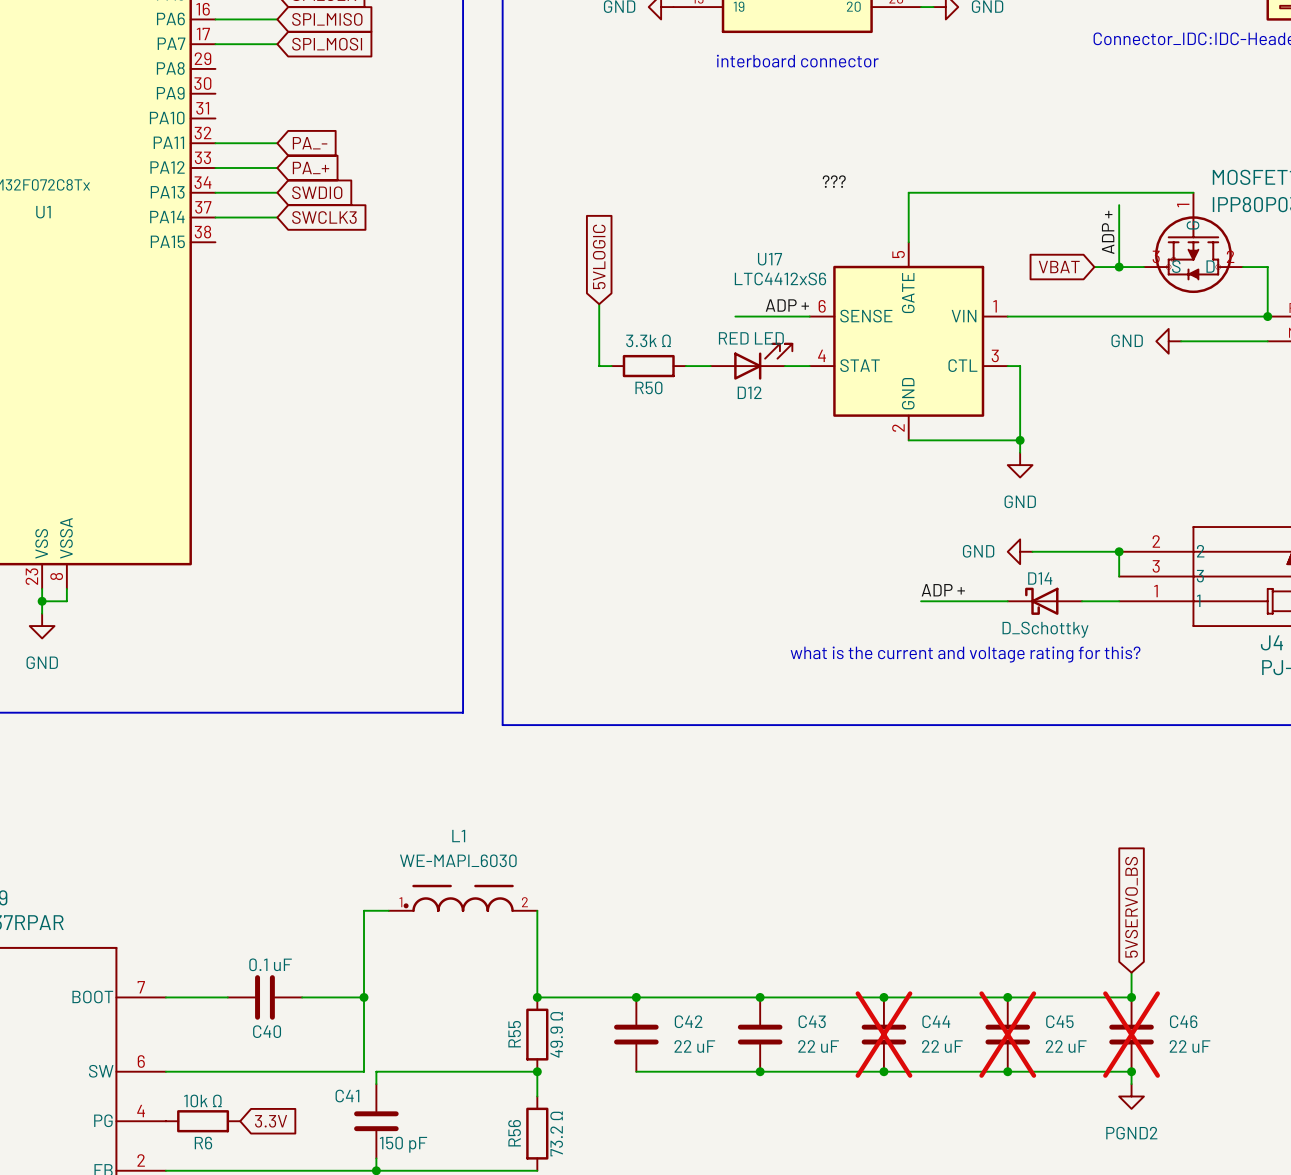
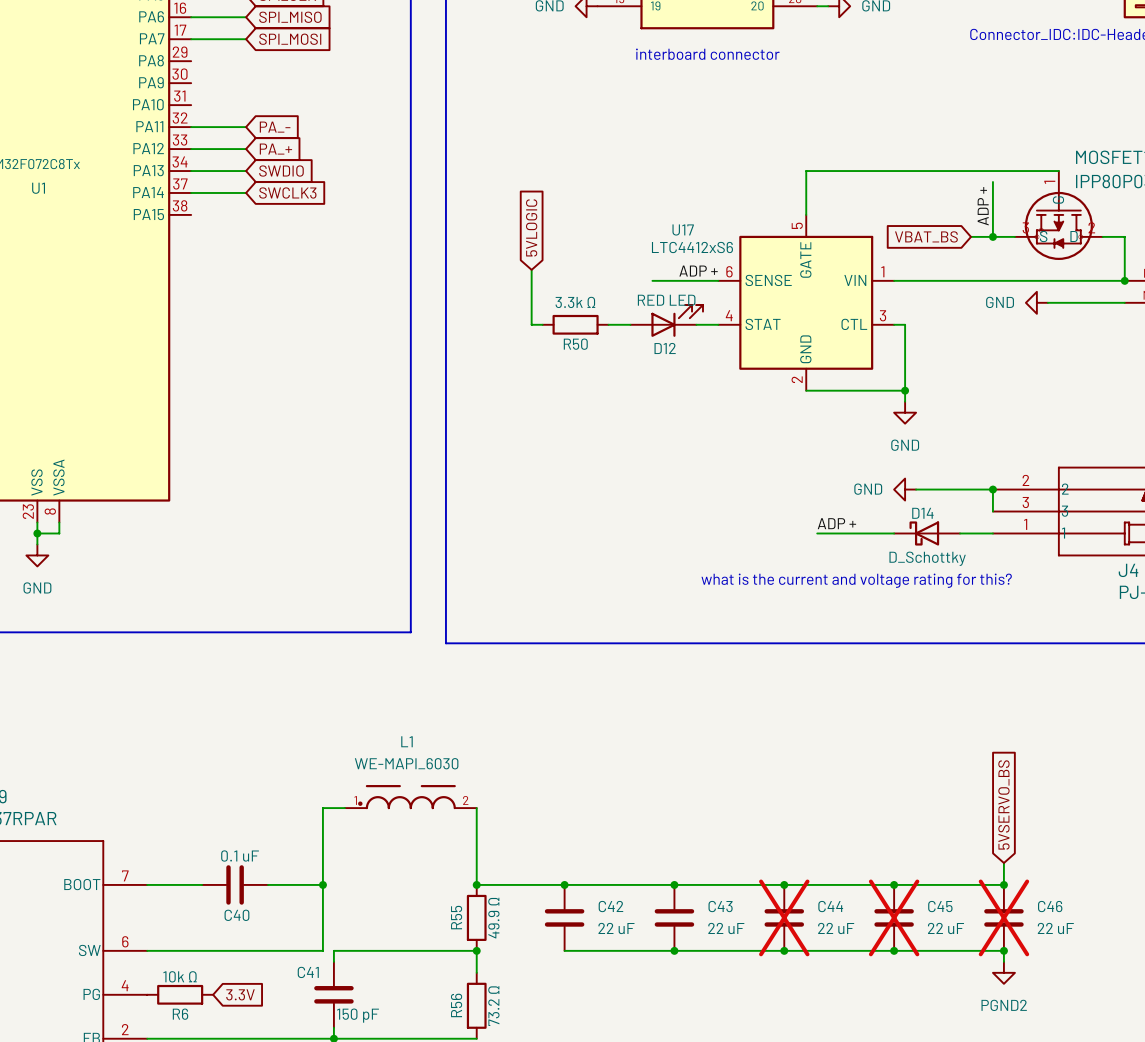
label: ??? (834, 181) -> none
global label: VBAT (1059, 267) -> VBAT_BS (926, 236)

